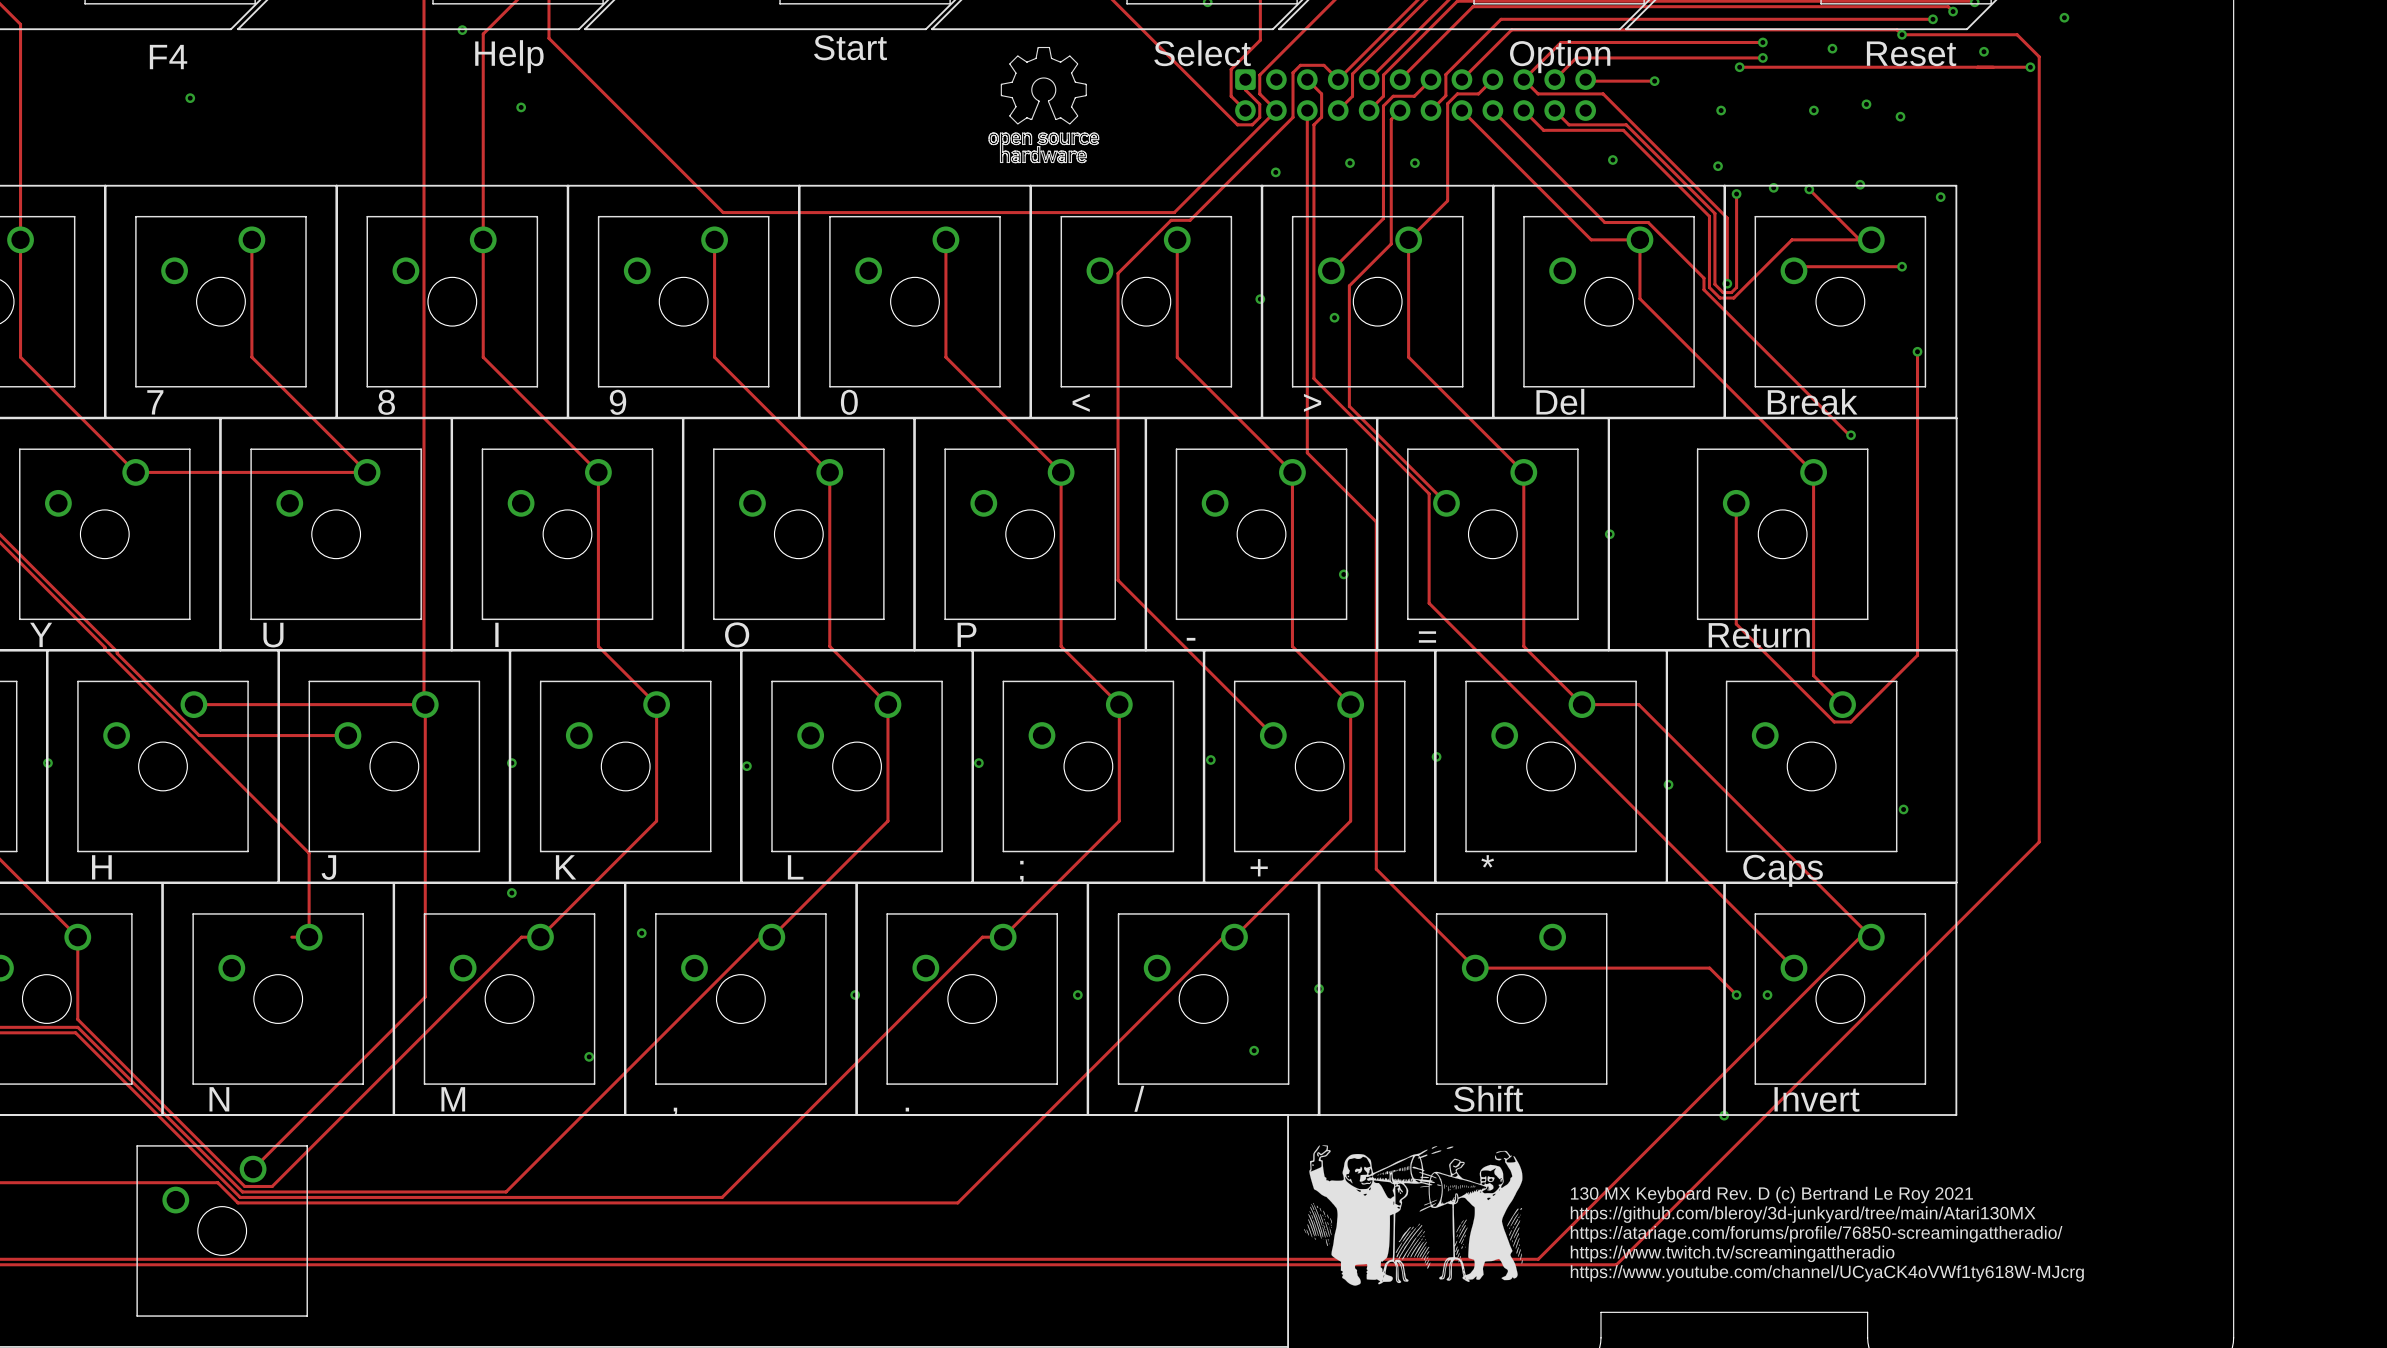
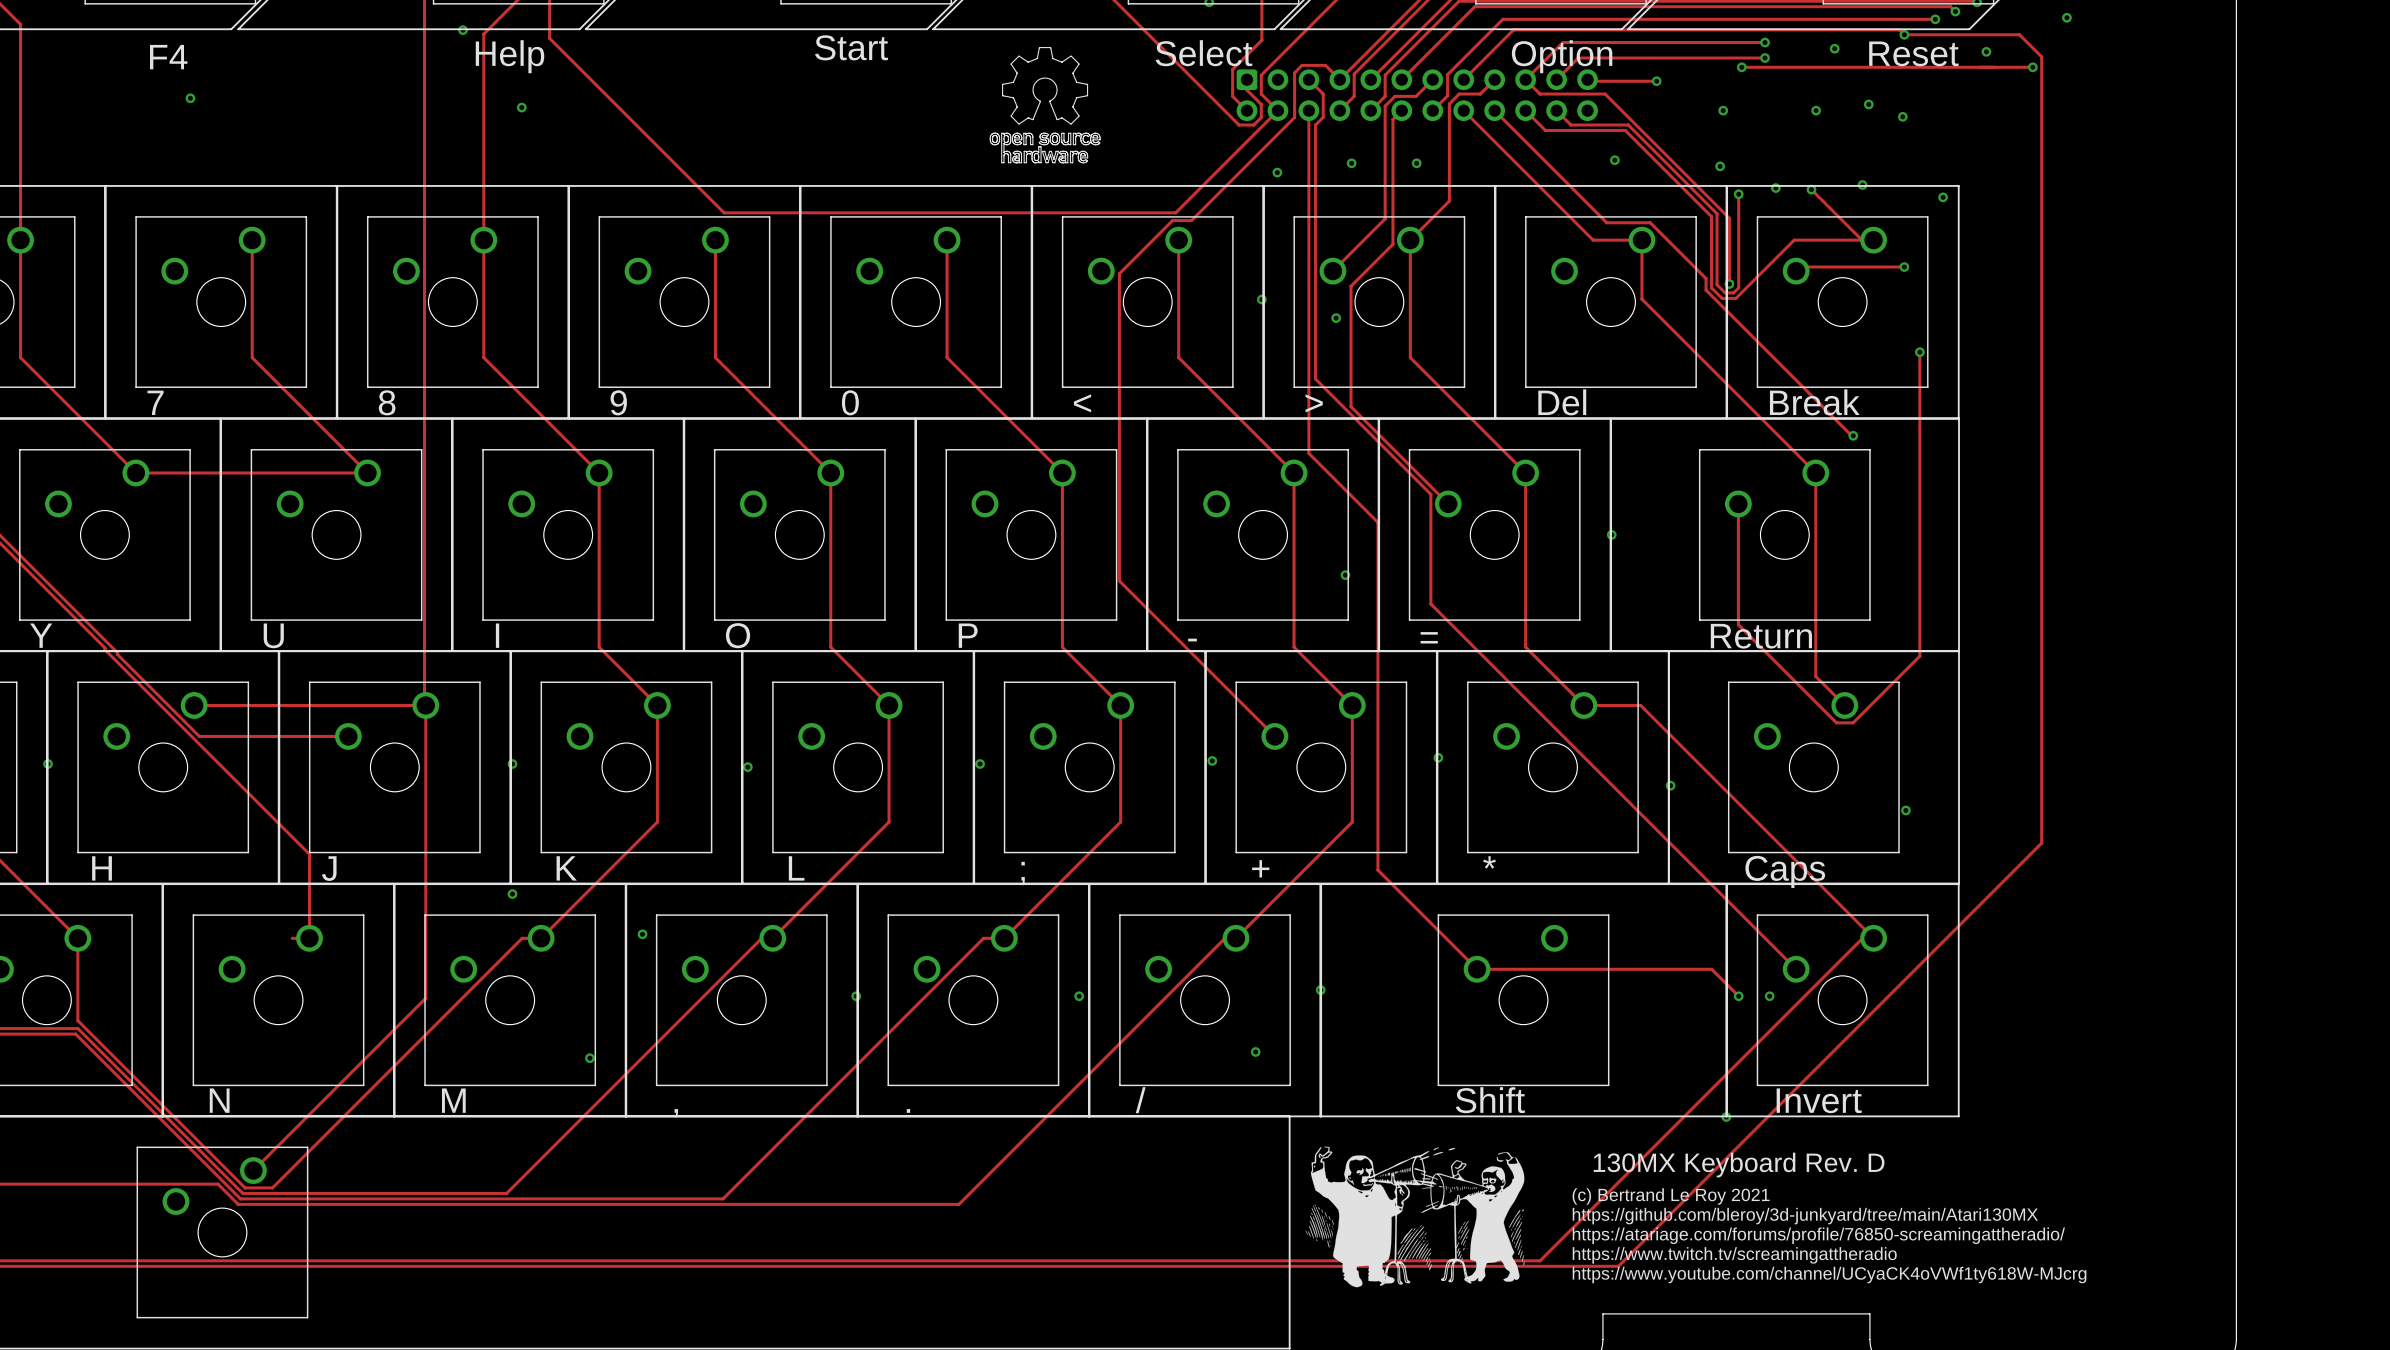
text: none -> 130MX Keyboard Rev. D (1739, 1165)
text: 130 MX Keyboard Rev. D (c) Bertrand Le Roy 2021 (1771, 1195) -> (c) Bertrand Le Roy 2021 (1671, 1196)

